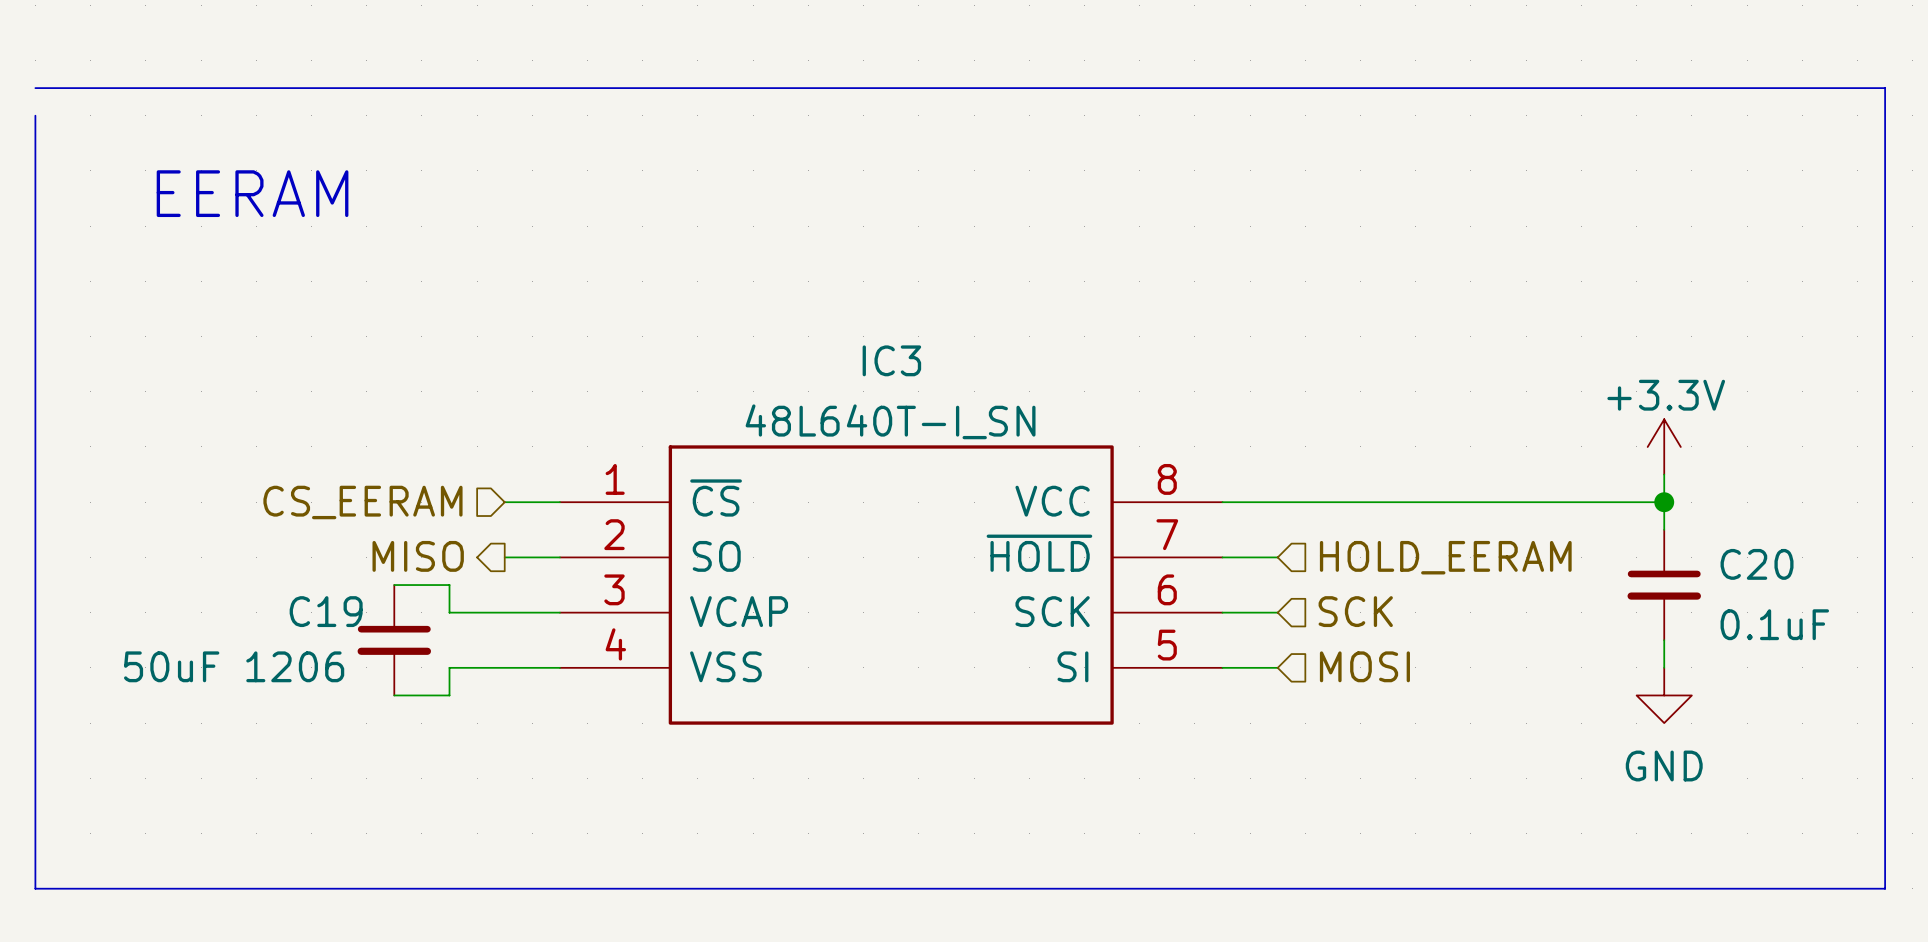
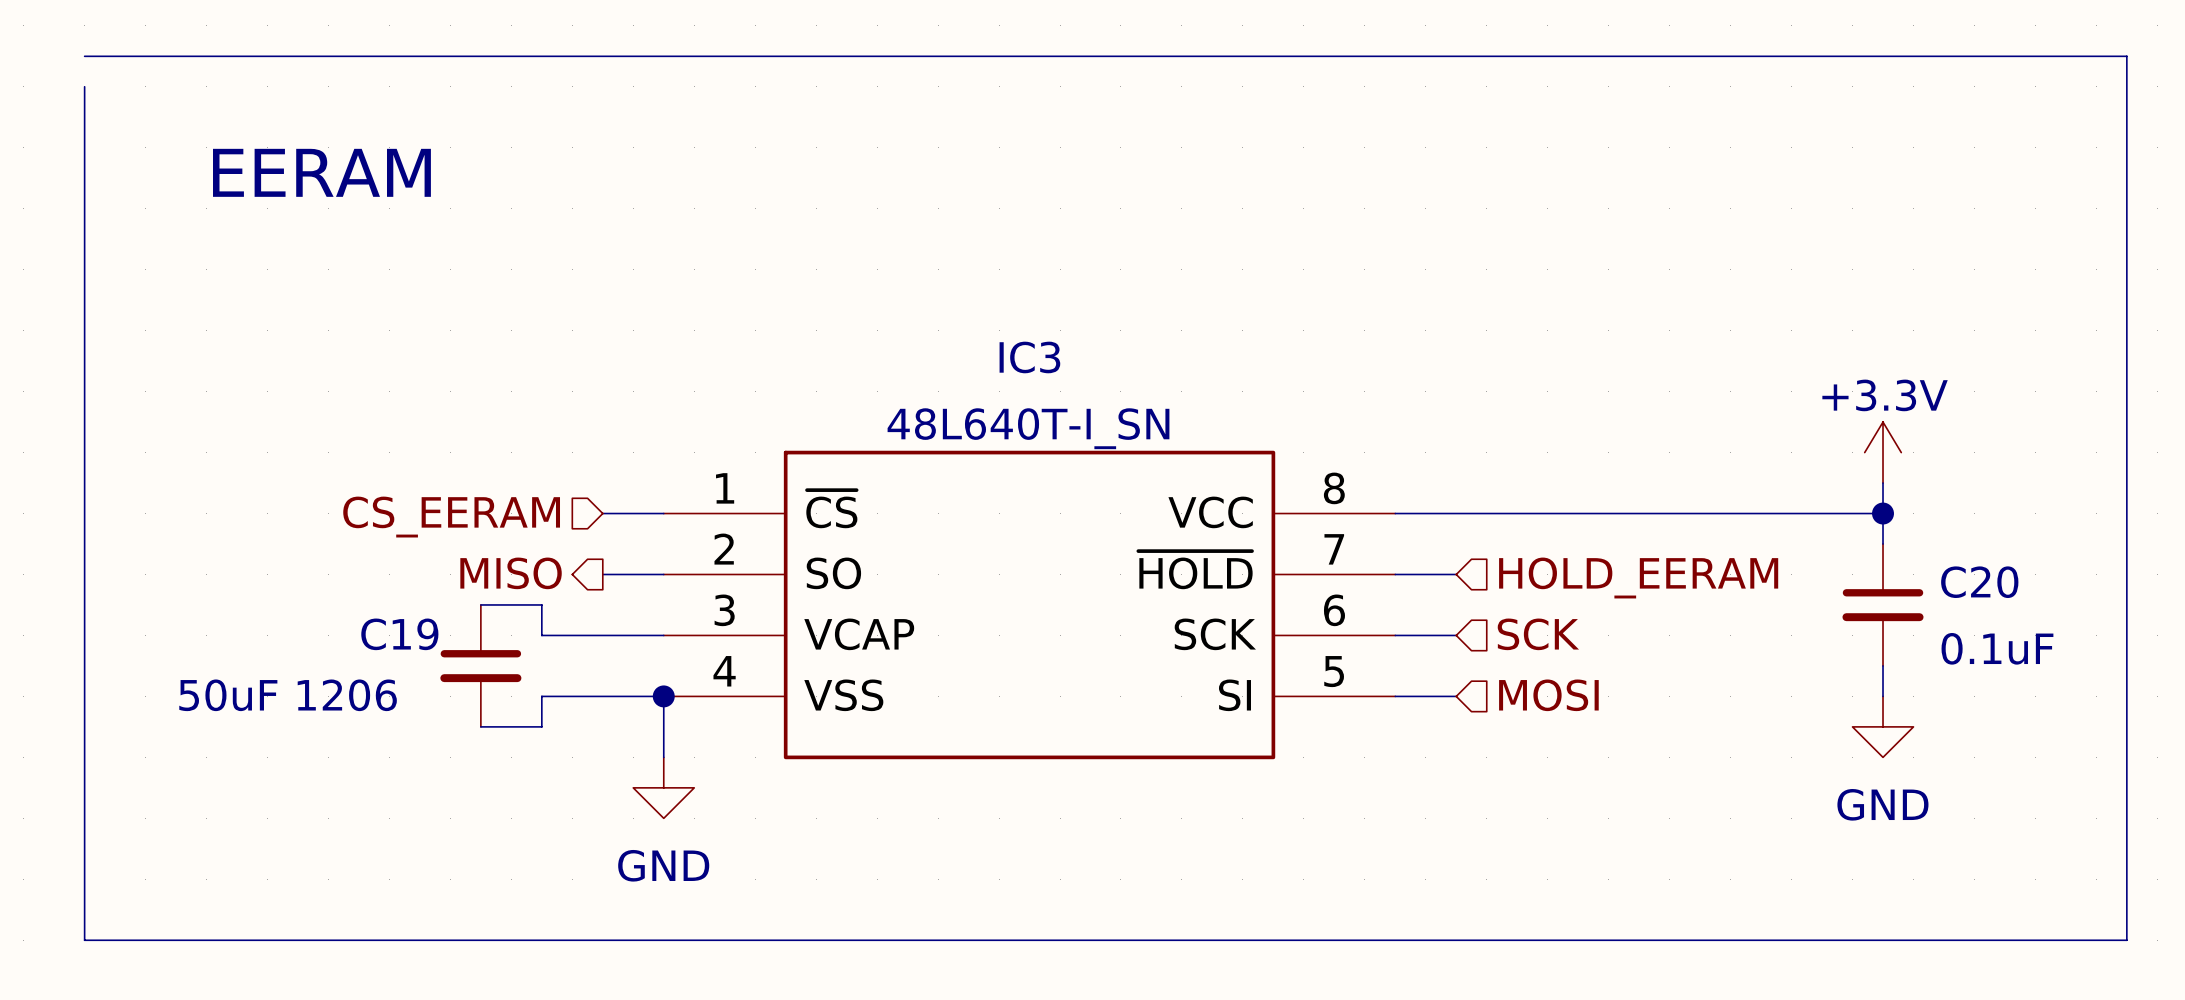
wire: none -> (663, 696) (663, 757)
junction: none -> (663, 696)
power symbol: none -> GND (663, 787)

